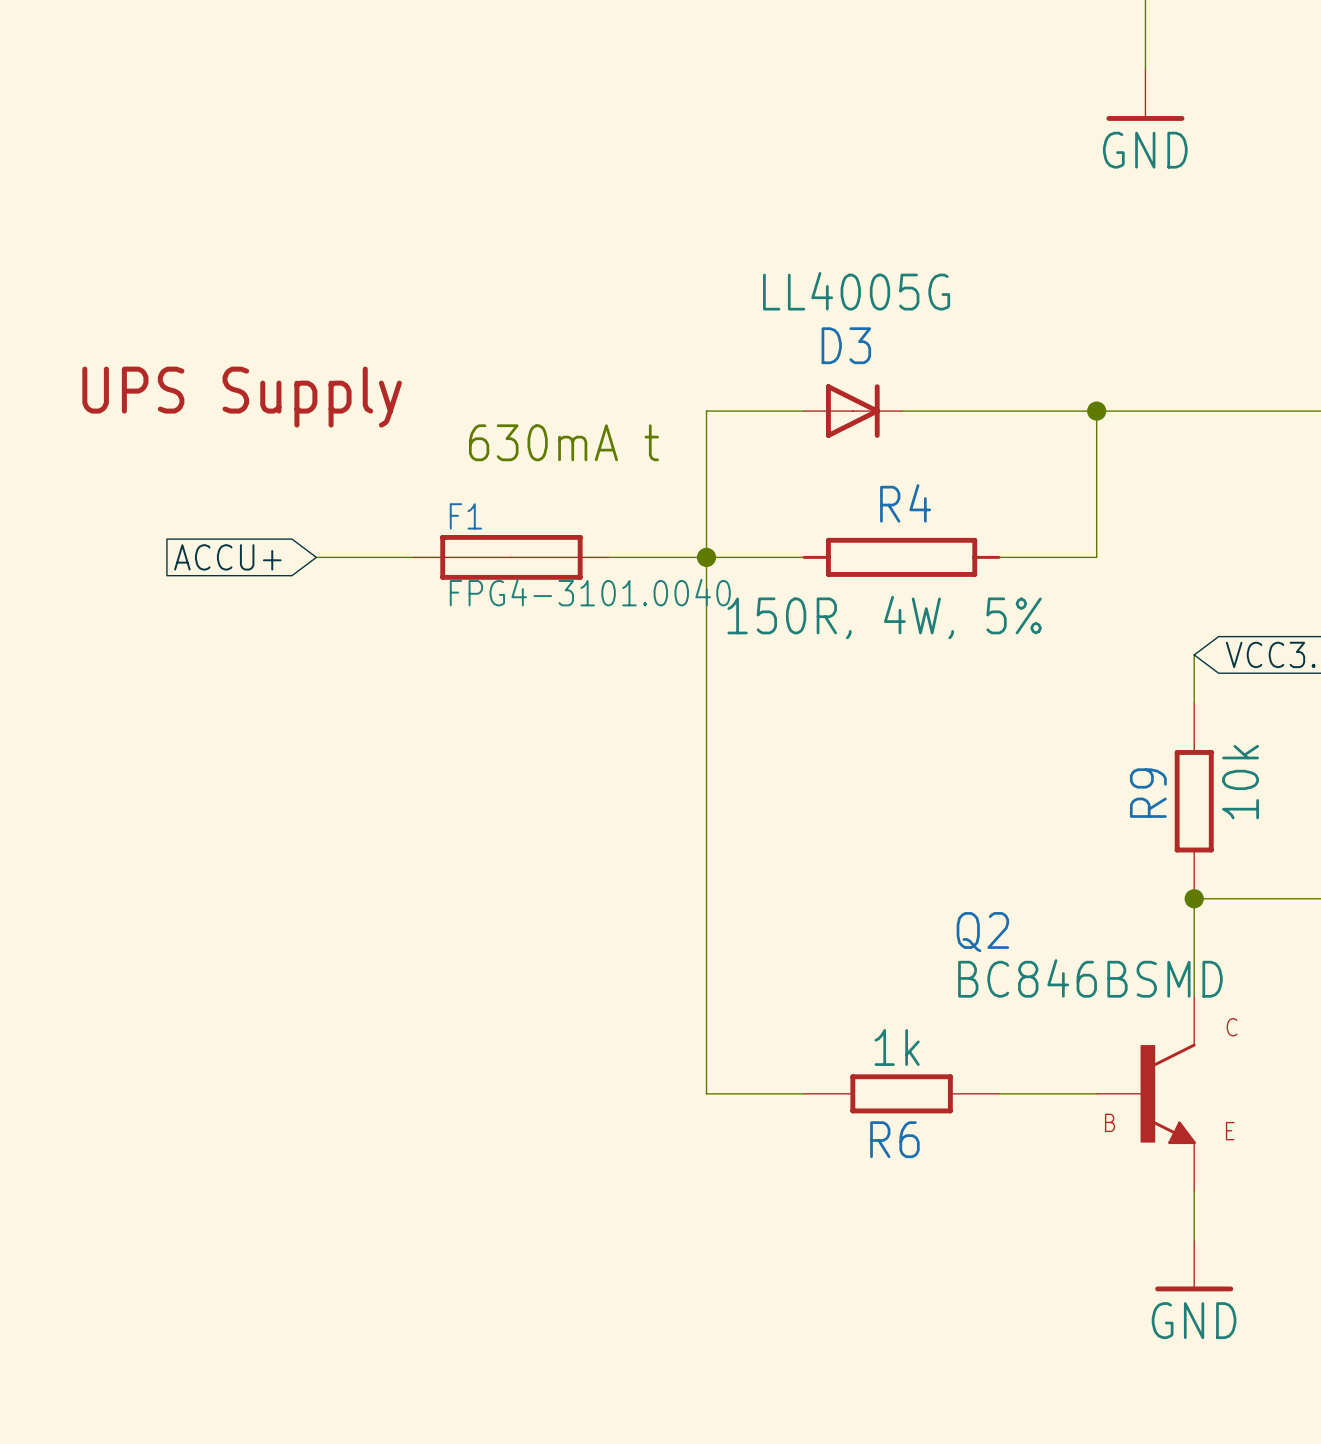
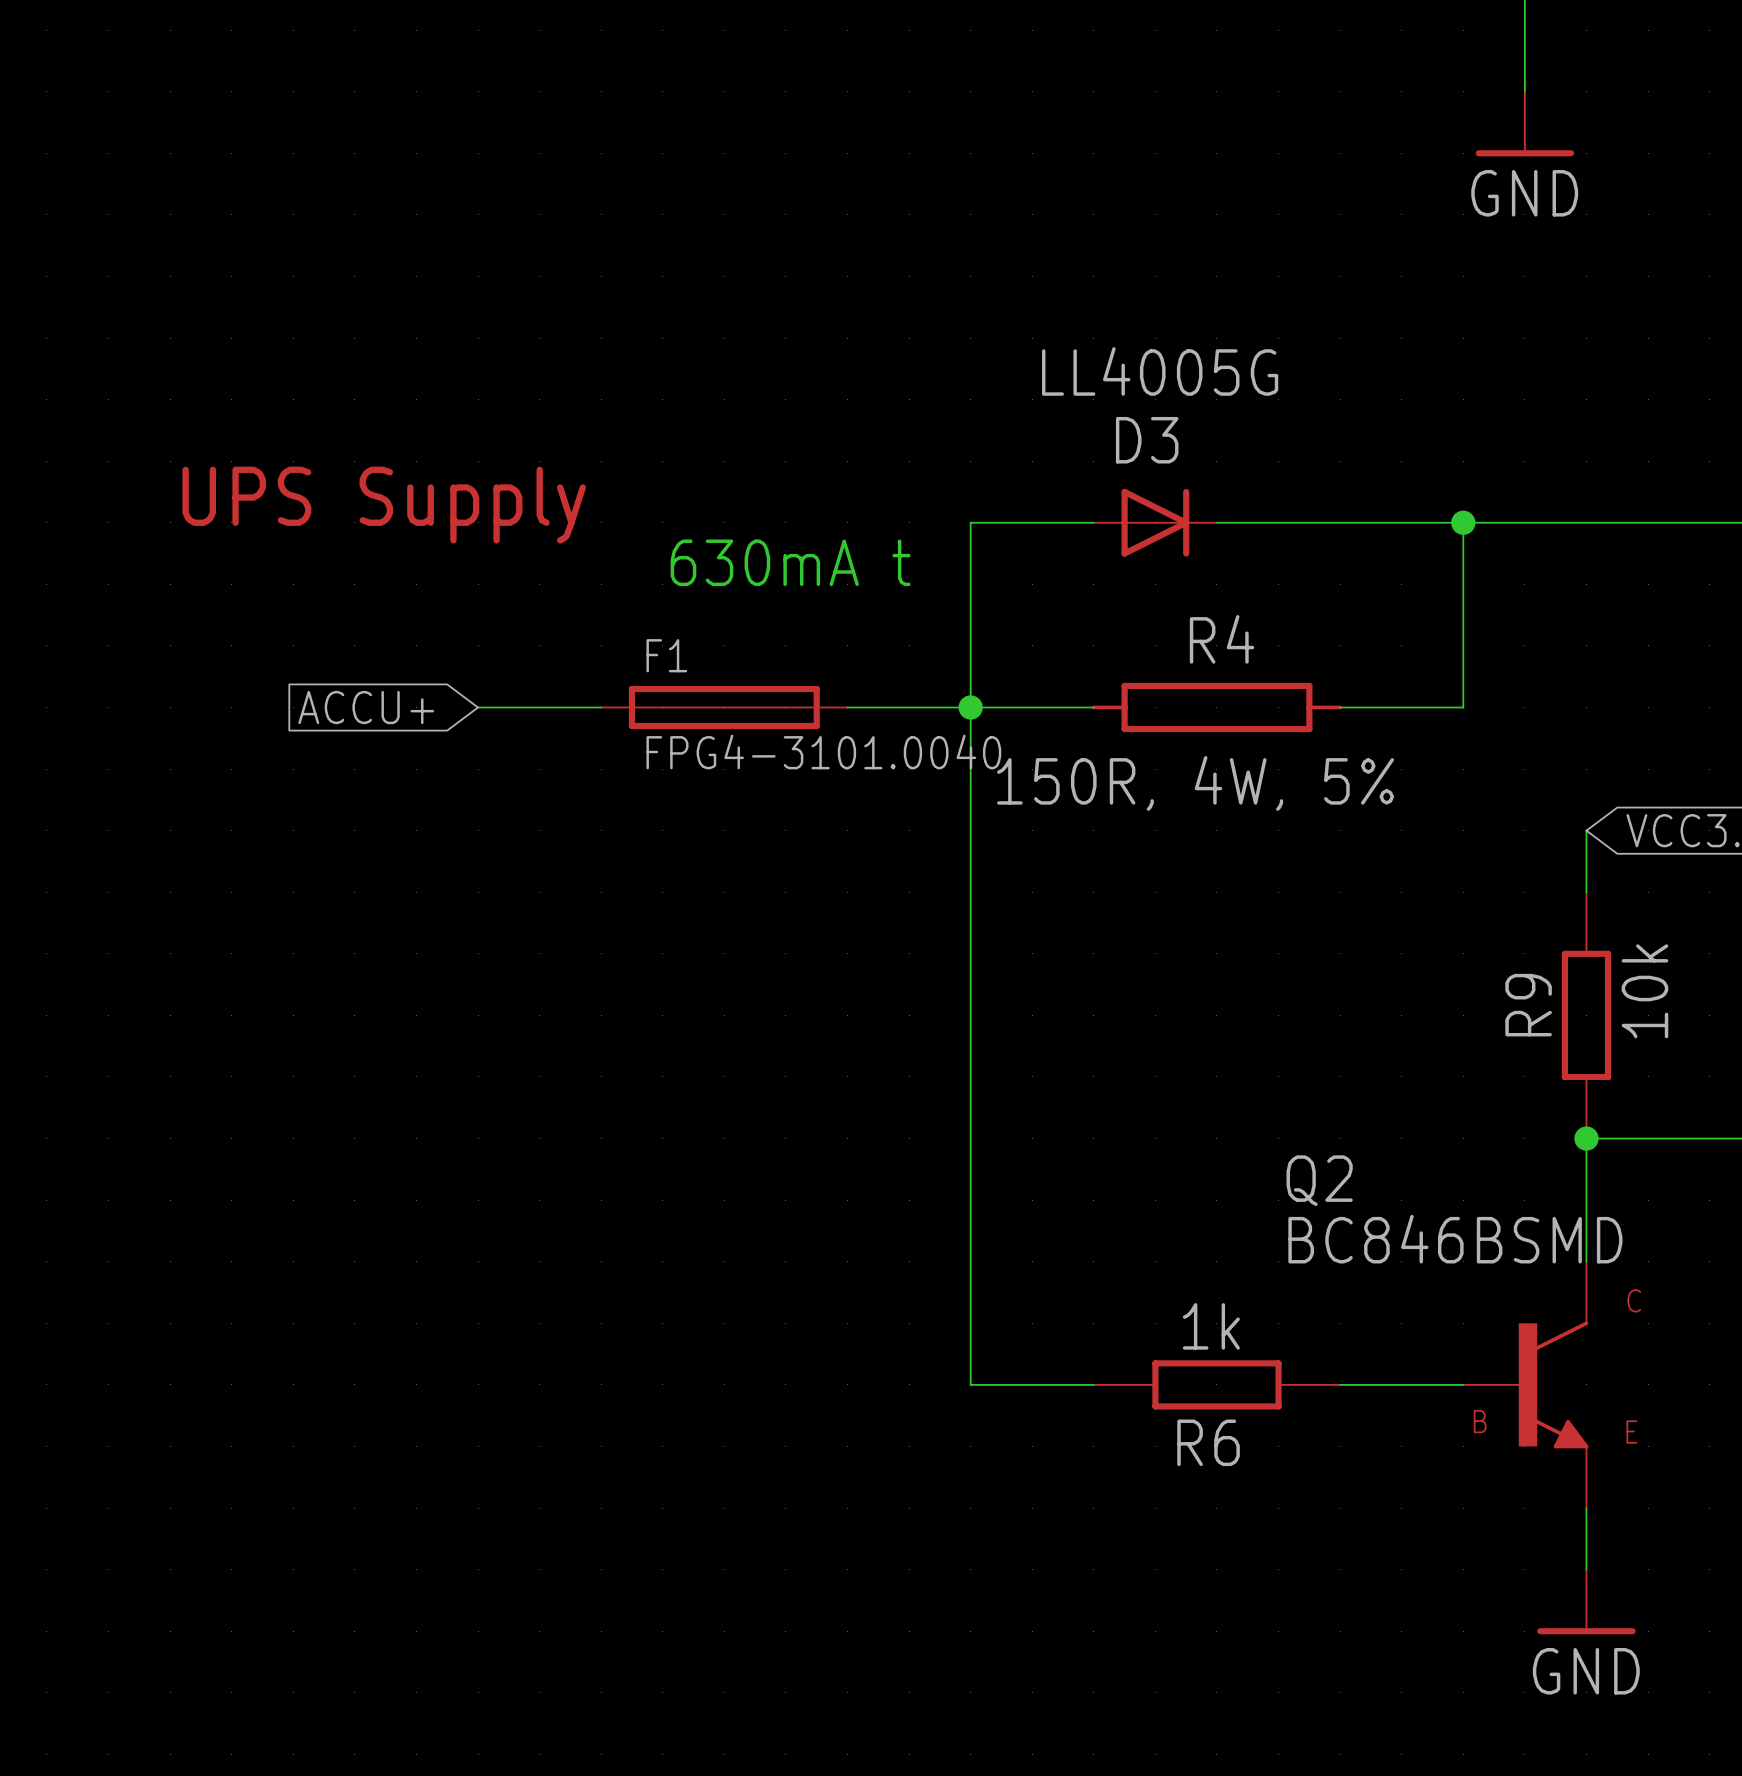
F1 symbol: [413, 534, 609, 580] -> [601, 685, 848, 730]

